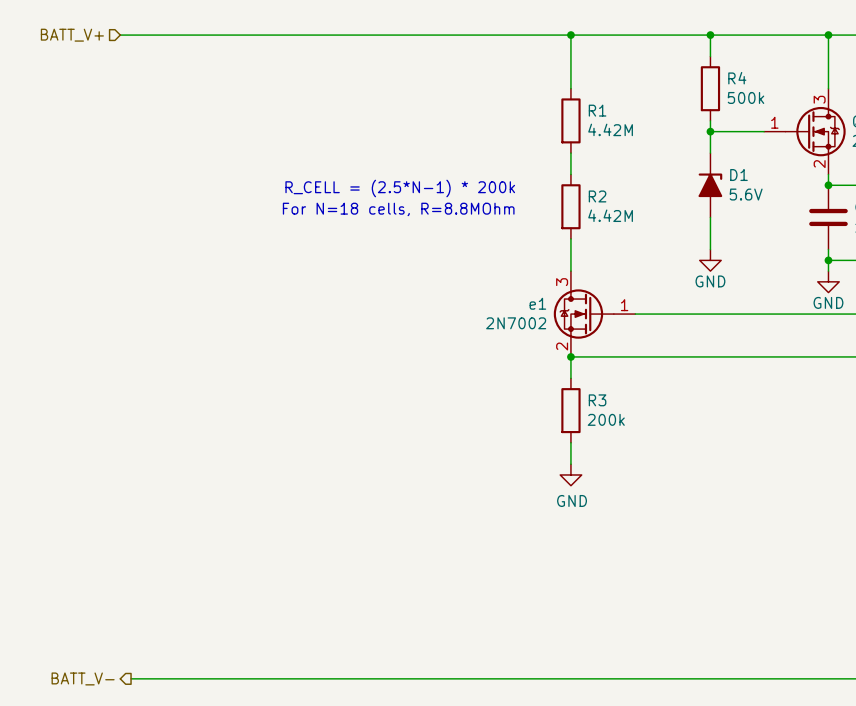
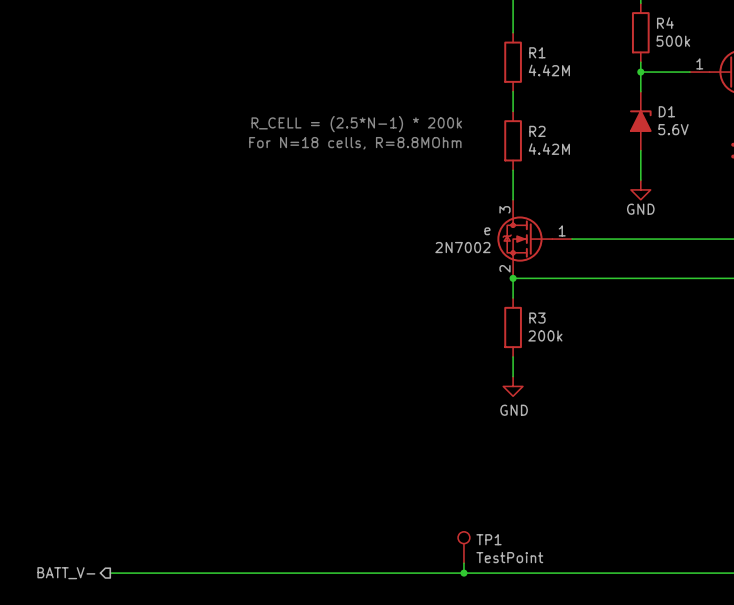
e1 name: e1 (537, 303) -> e (487, 231)
TP1: none -> TestPoint (463, 547)
wire: none -> (463, 563) (463, 573)
junction: none -> (463, 573)

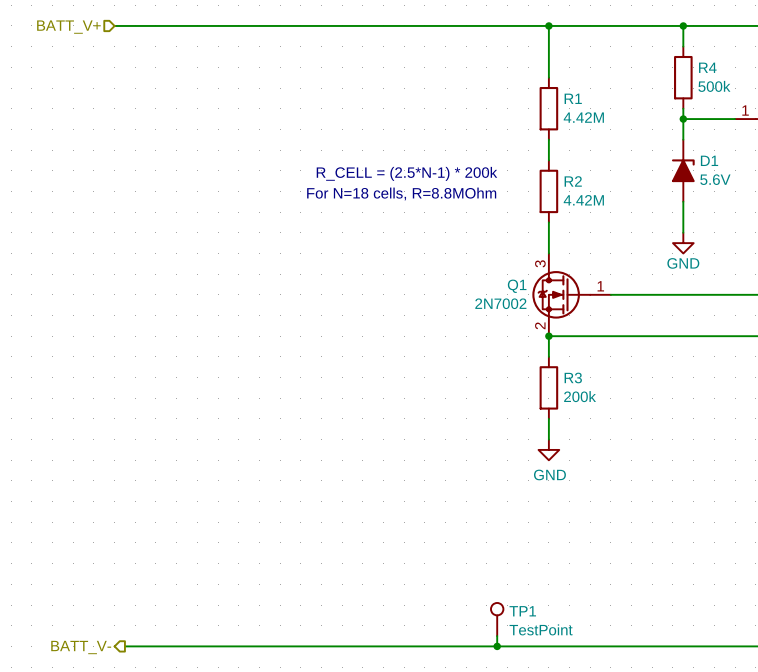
e name: e (487, 231) -> Q1 (517, 286)

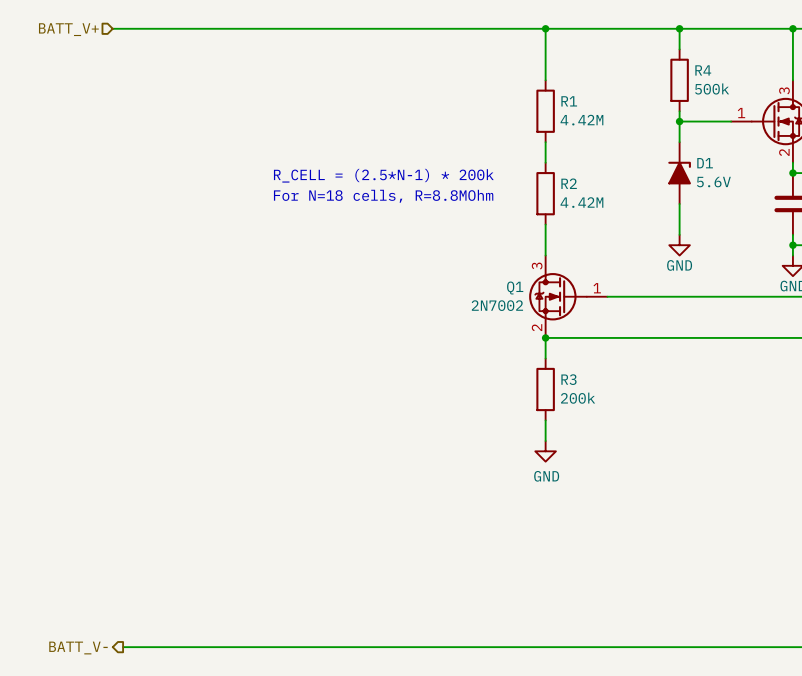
TP1: TestPoint (497, 619) -> none
wire: (497, 636) (497, 646) -> none
junction: (497, 646) -> none

